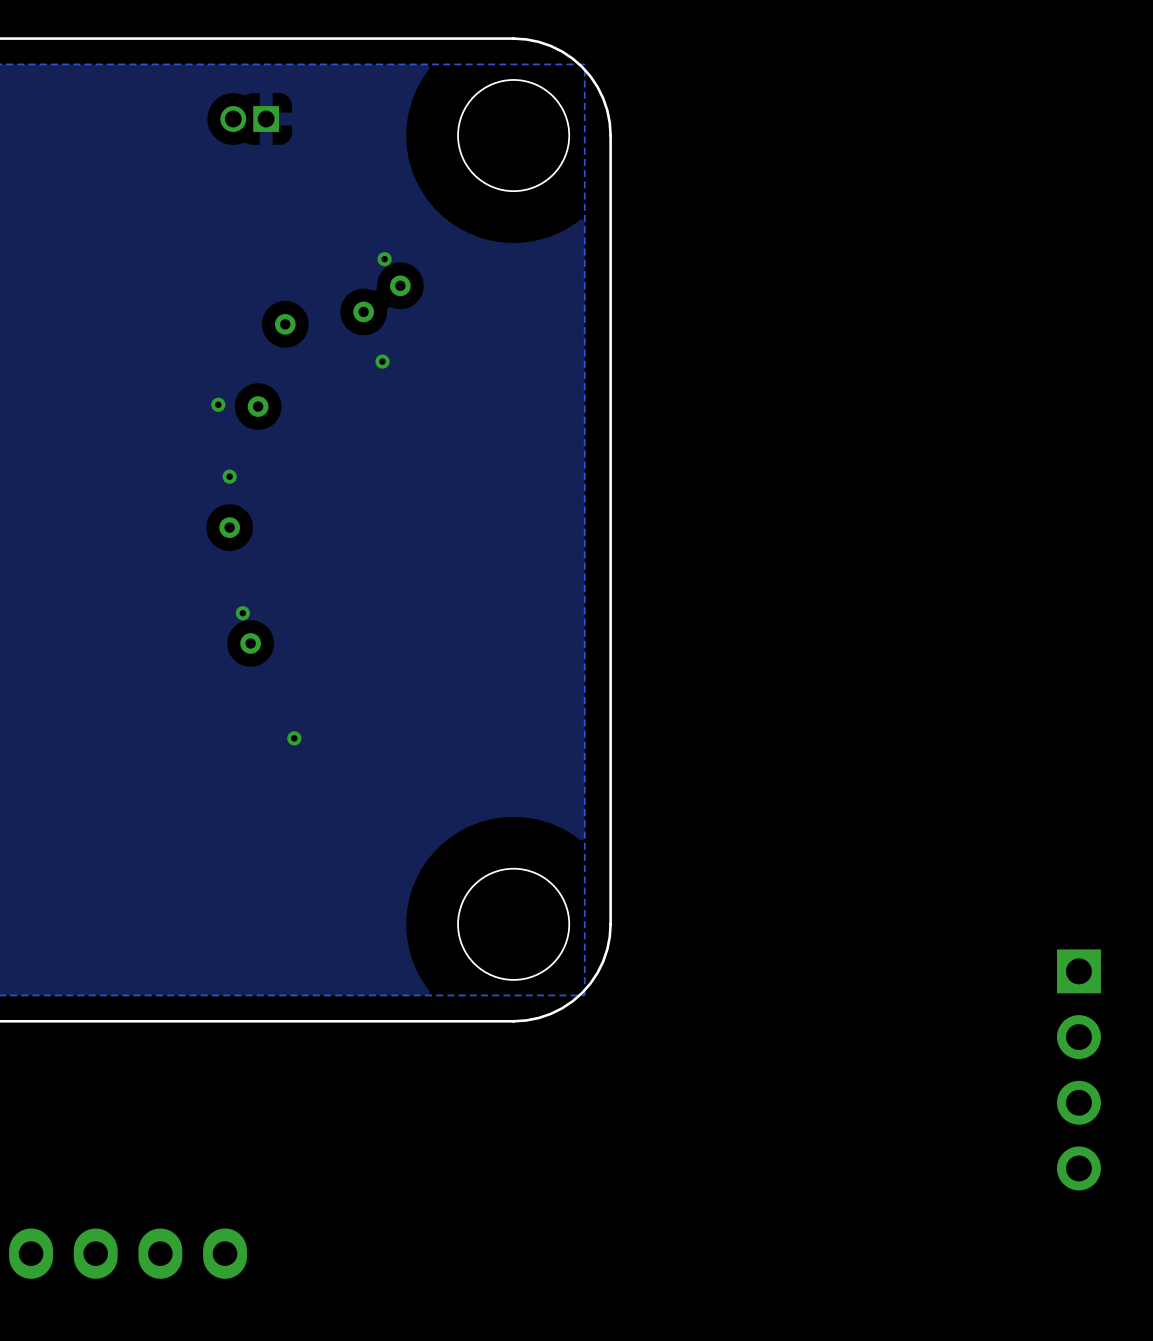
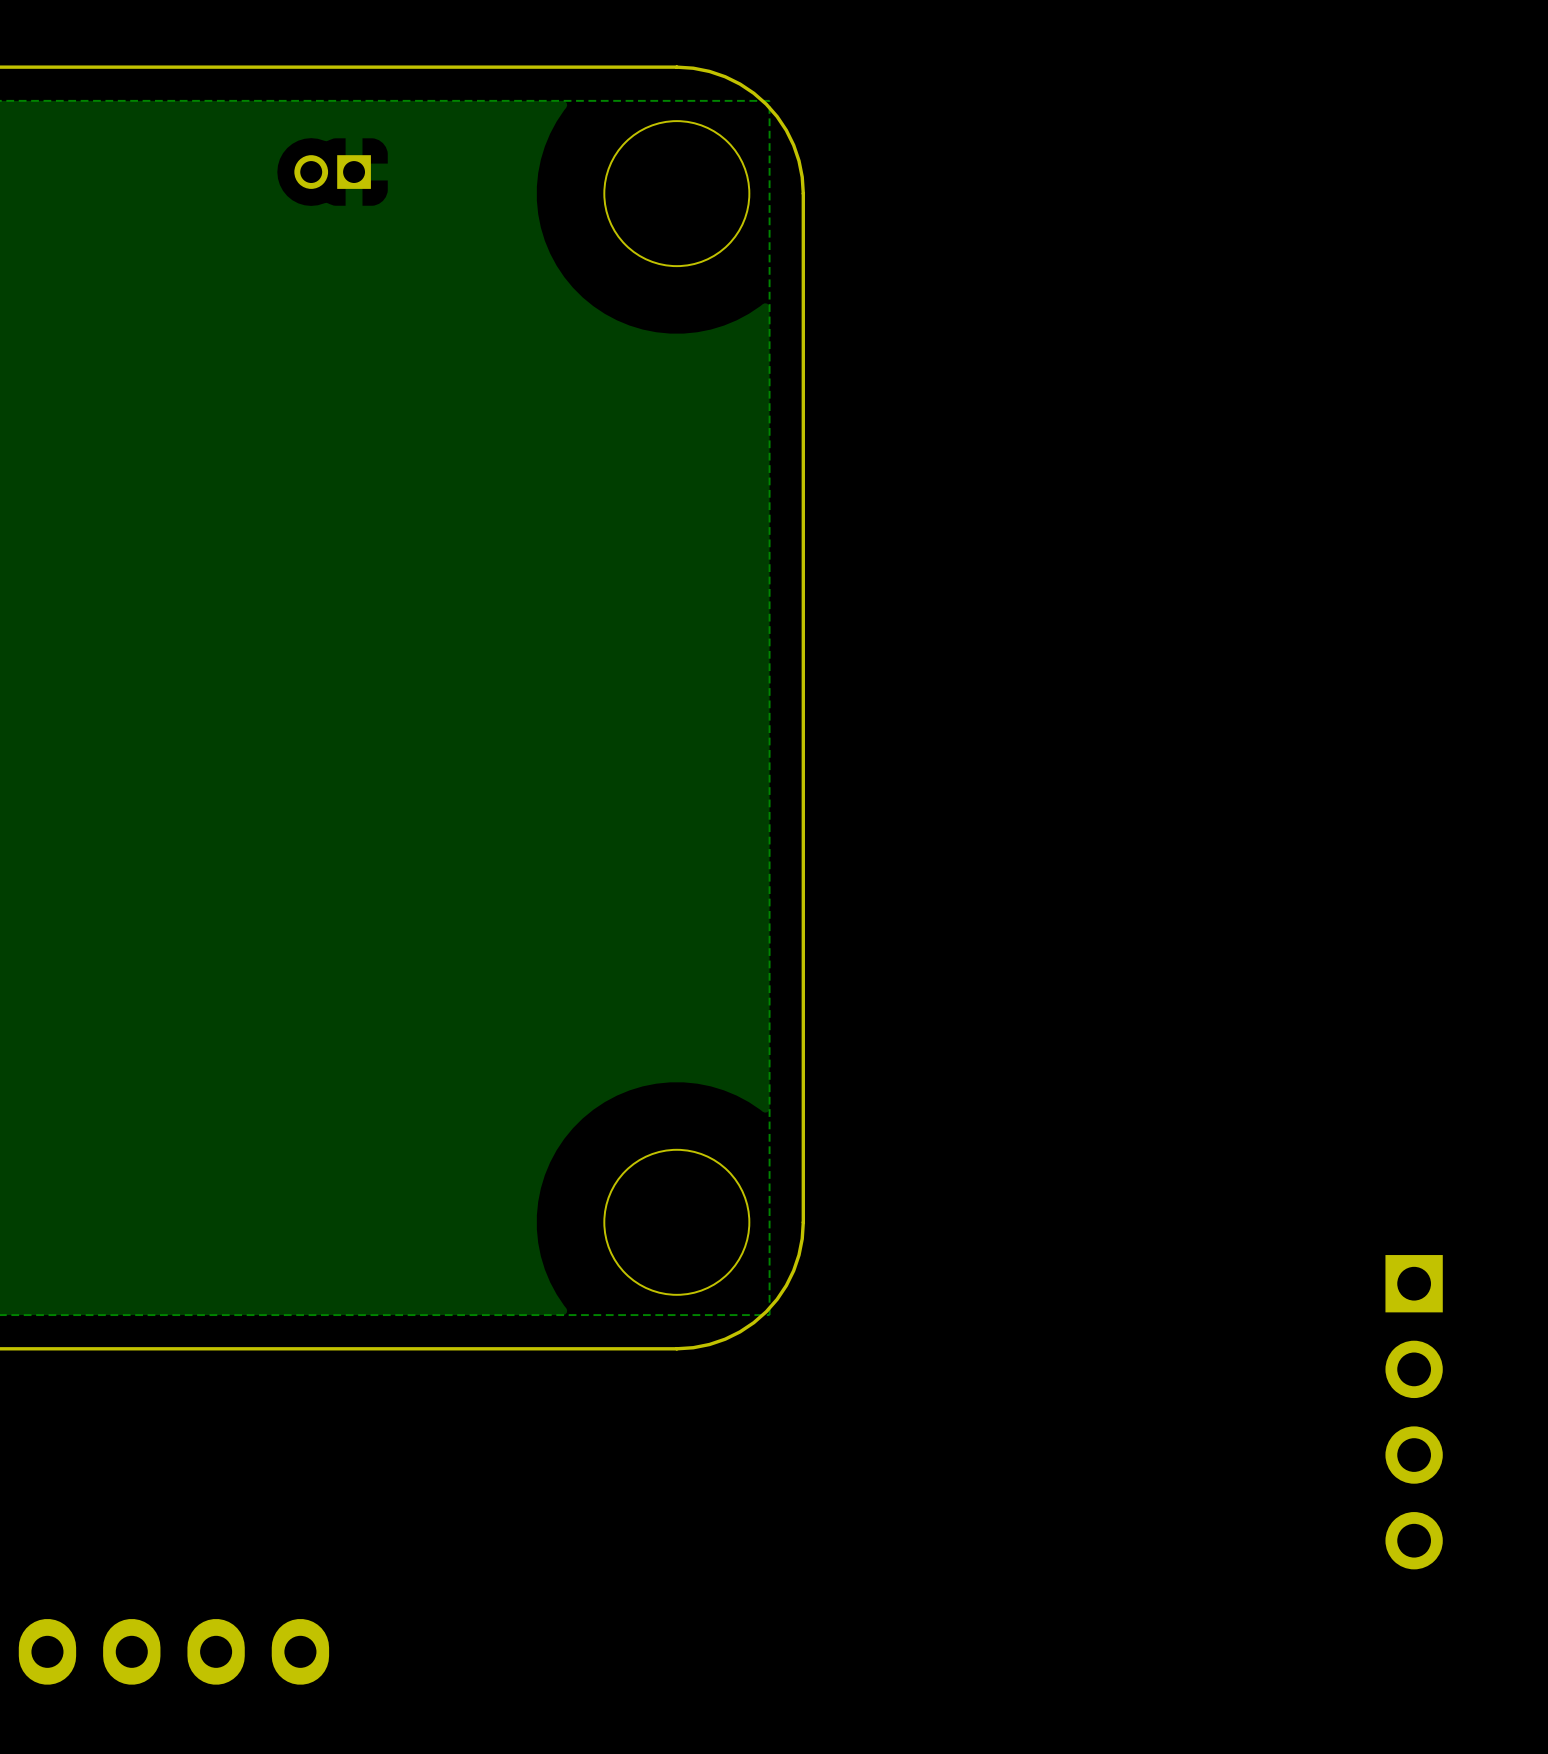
via: (384, 259) -> none
via: (400, 285) -> none
via: (363, 311) -> none
via: (285, 324) -> none
via: (382, 361) -> none
via: (218, 404) -> none
via: (258, 406) -> none
via: (229, 476) -> none
via: (229, 527) -> none
via: (242, 613) -> none
via: (250, 643) -> none
via: (294, 738) -> none

